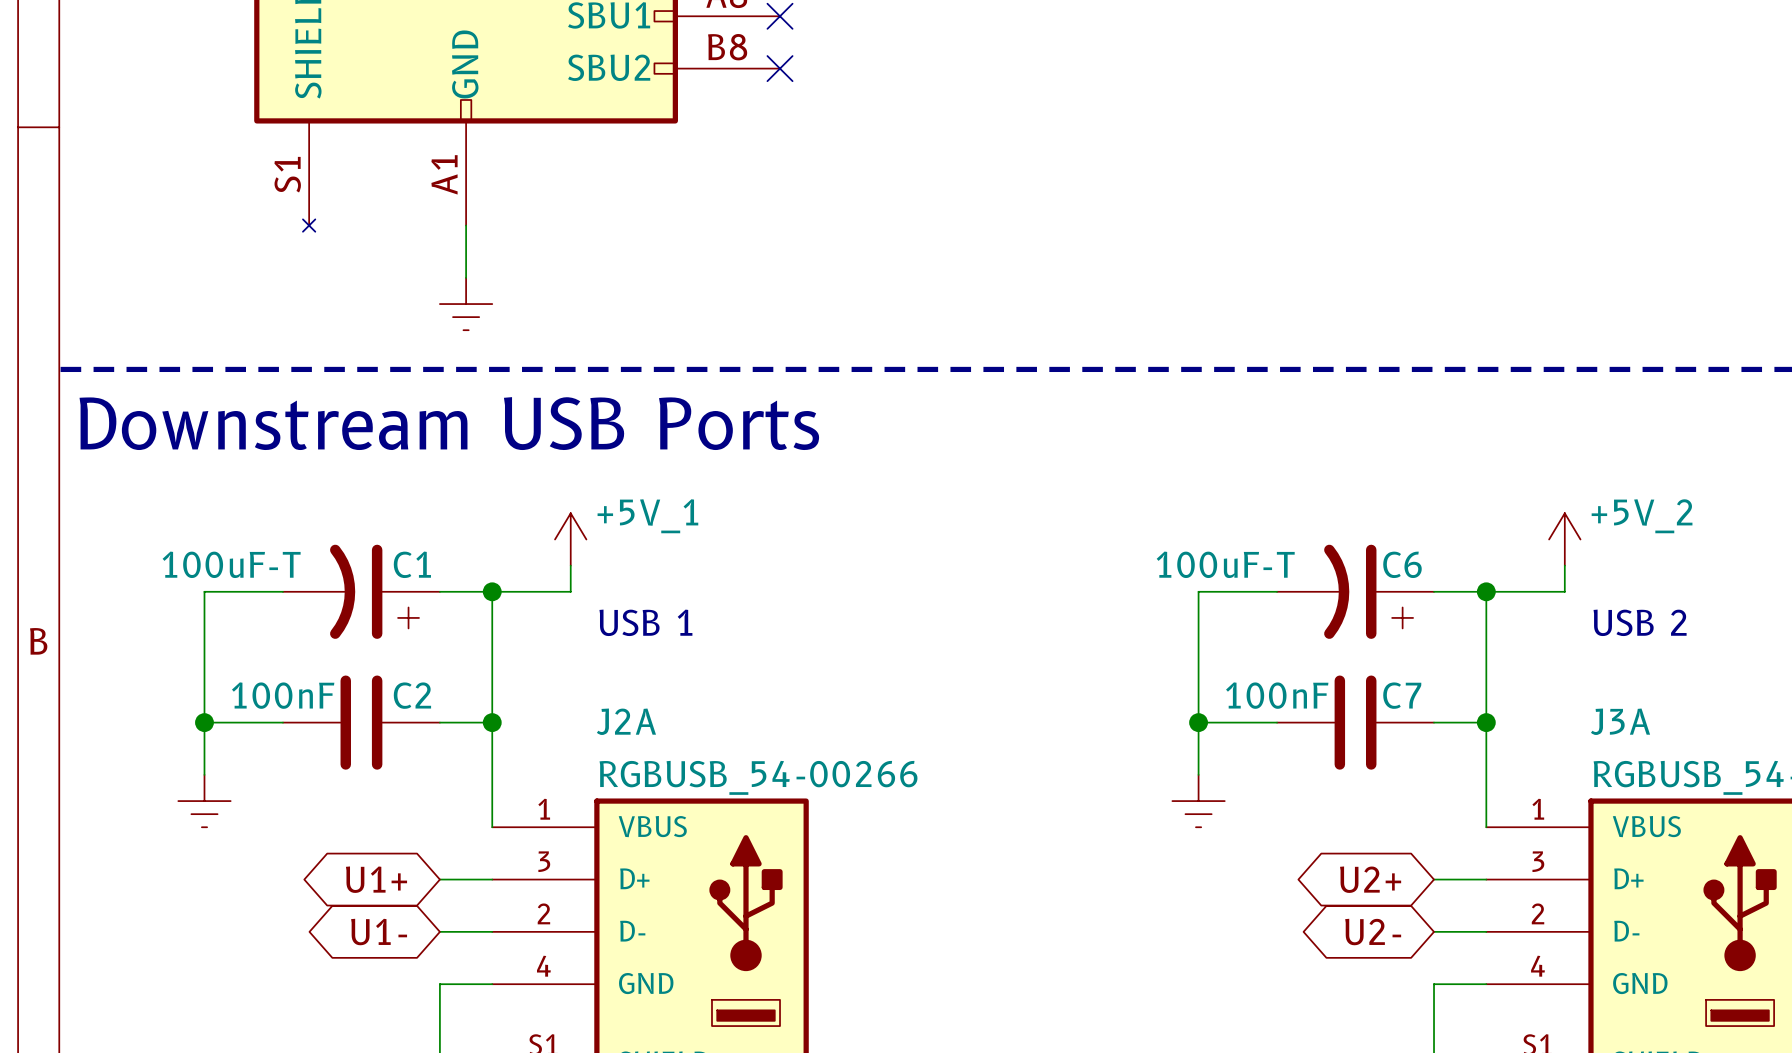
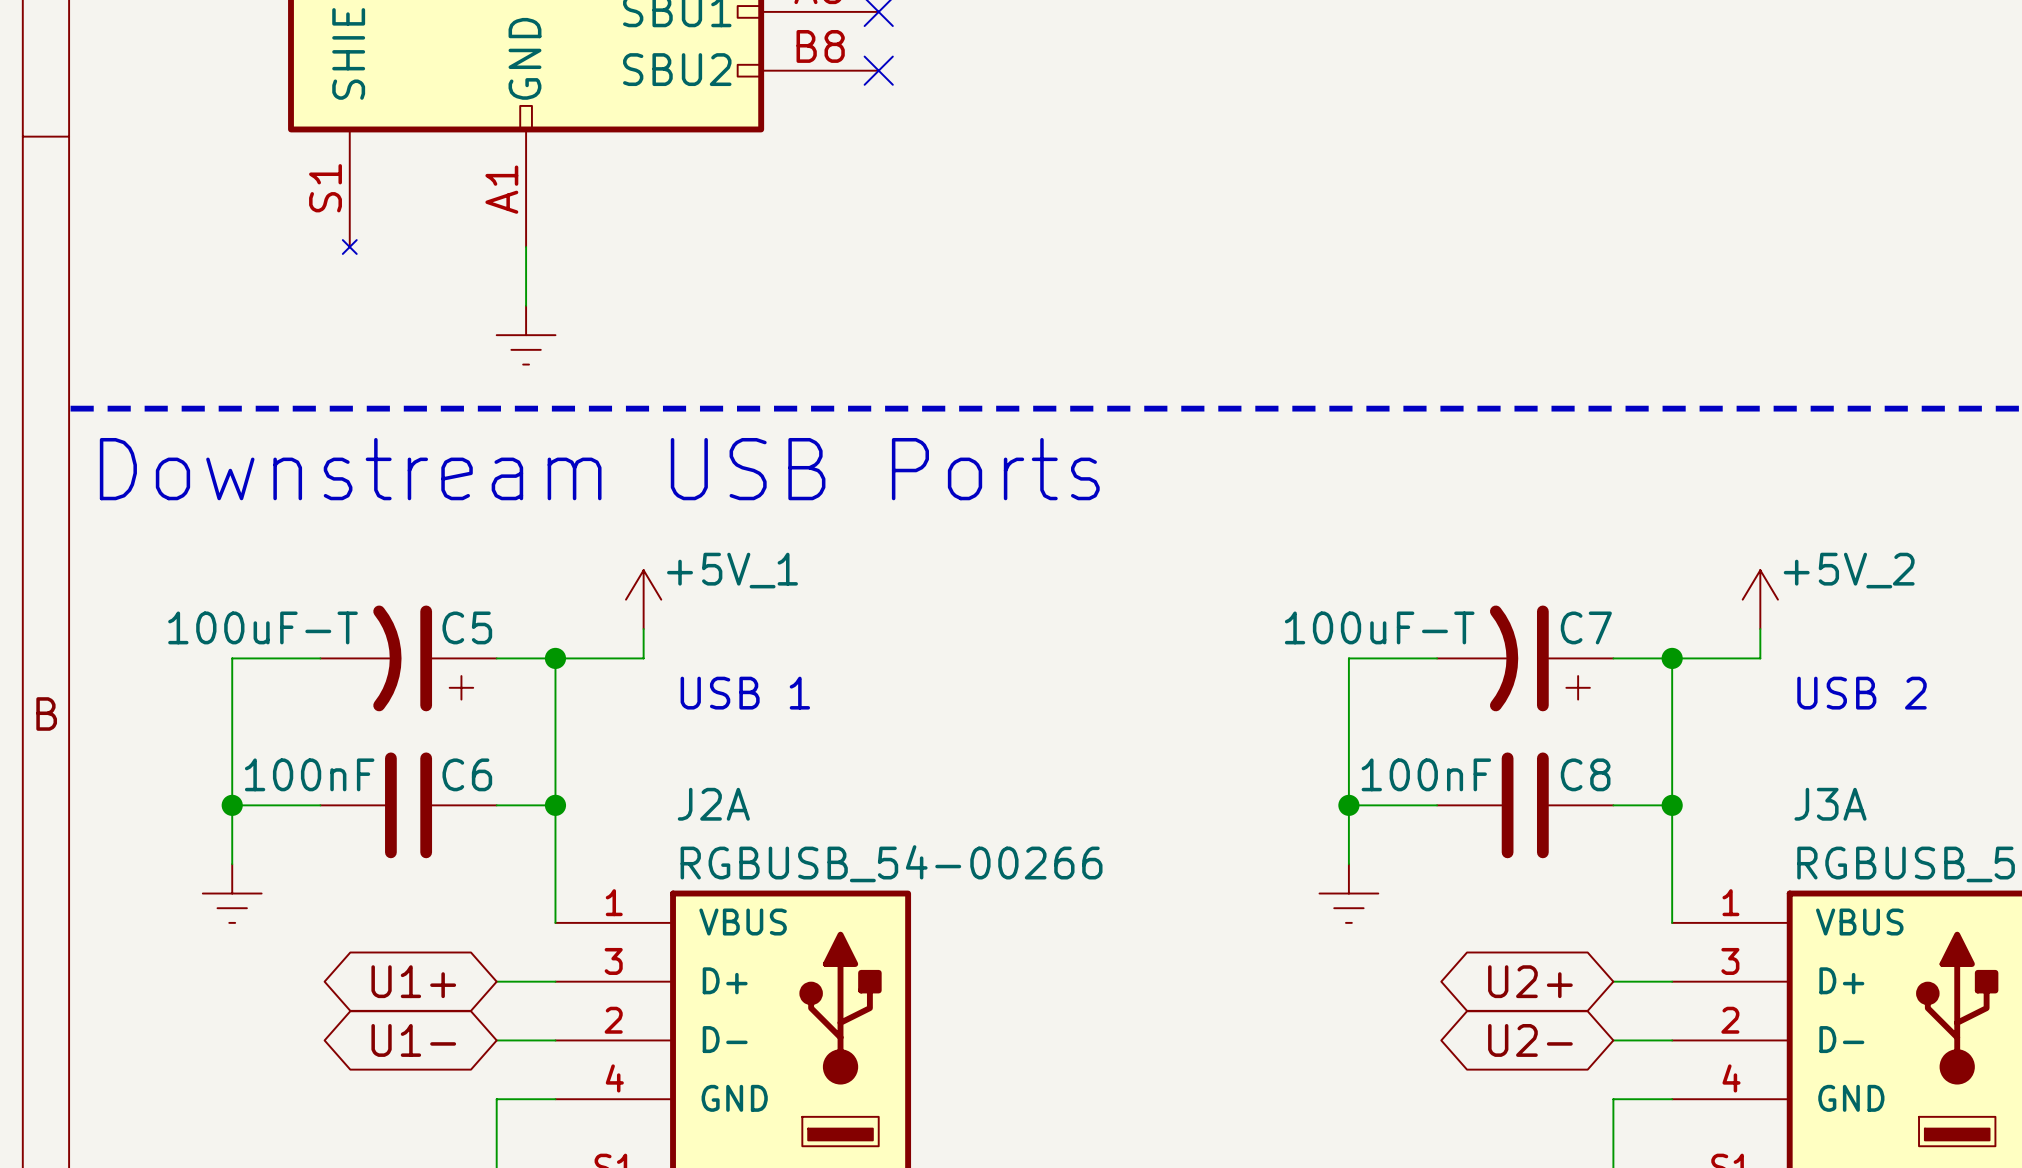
C1 name: C1 (412, 564) -> C5 (467, 627)
C6 name: C6 (1402, 564) -> C7 (1586, 627)
C2 name: C2 (412, 695) -> C6 (467, 774)
C7 name: C7 (1402, 695) -> C8 (1585, 774)

